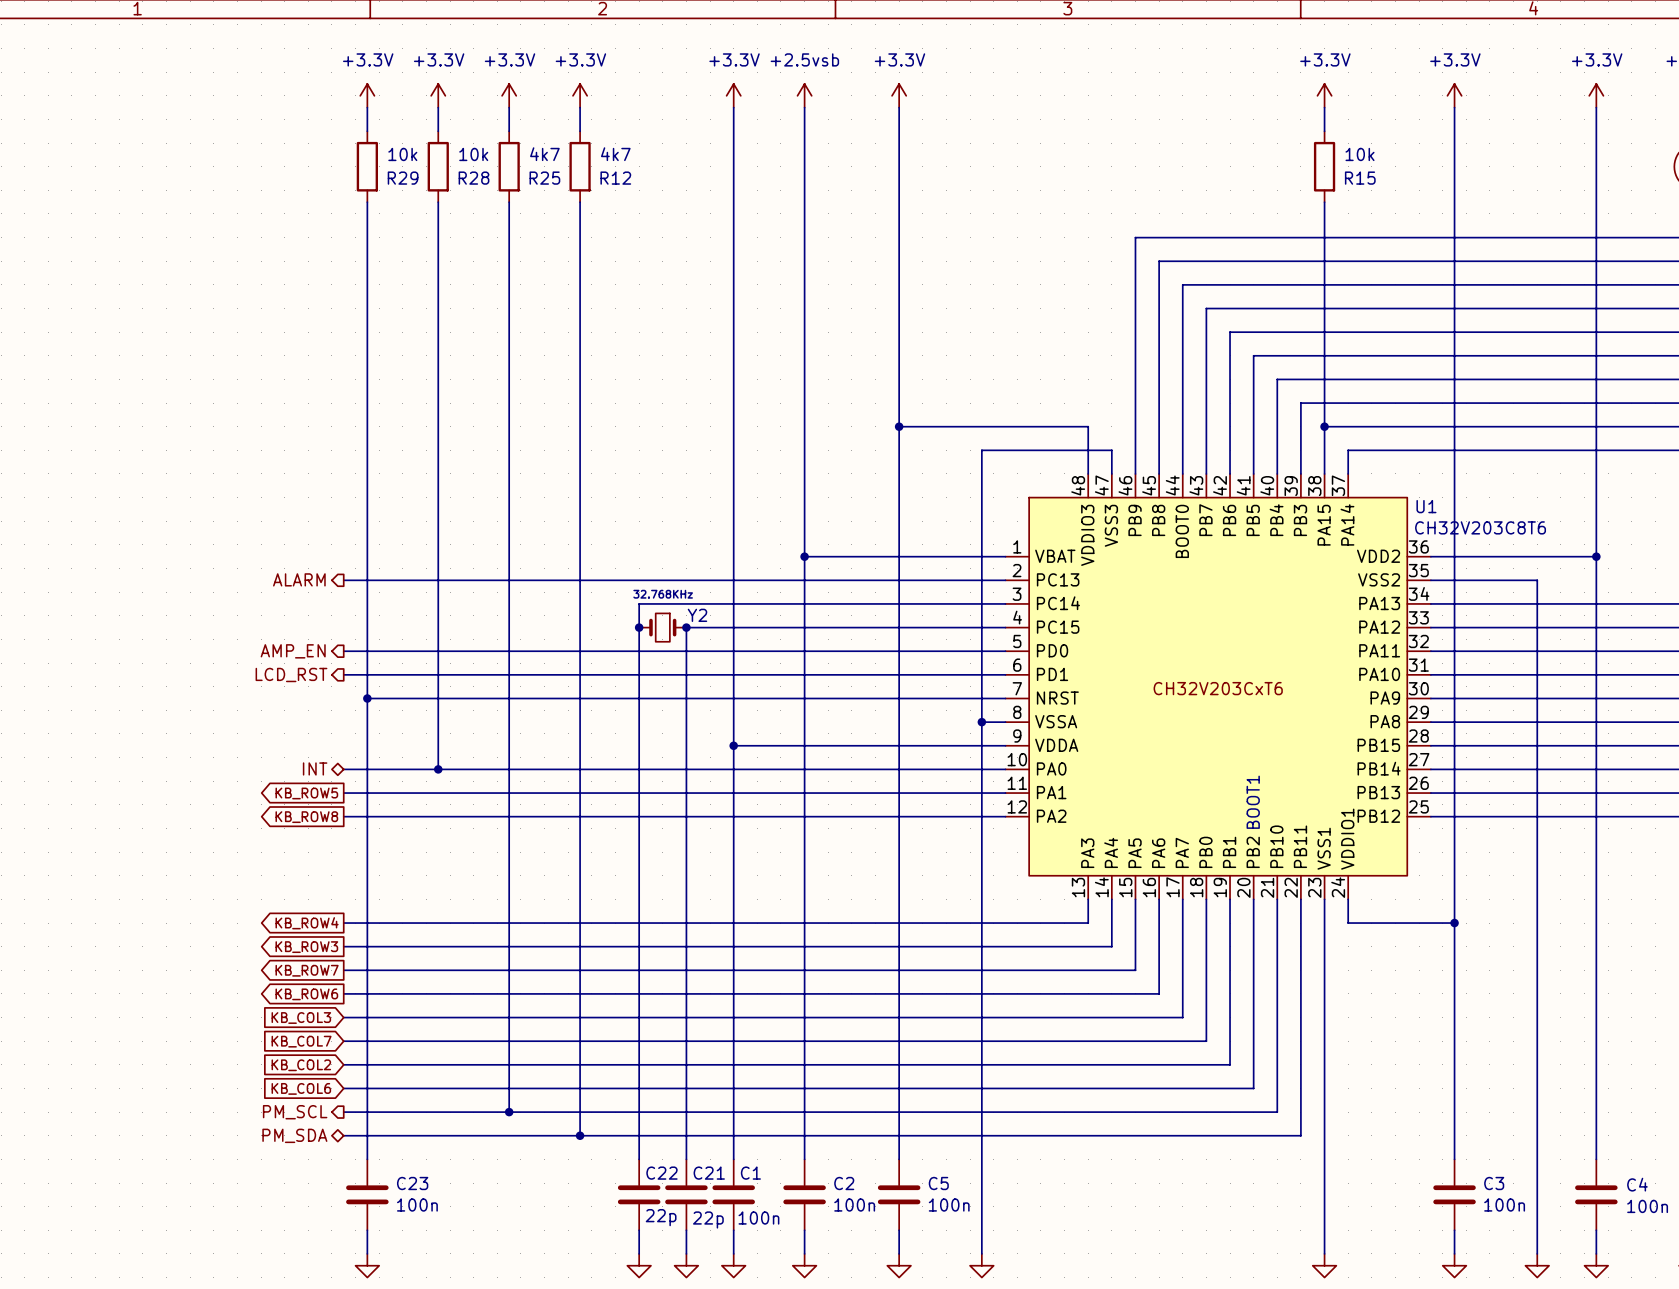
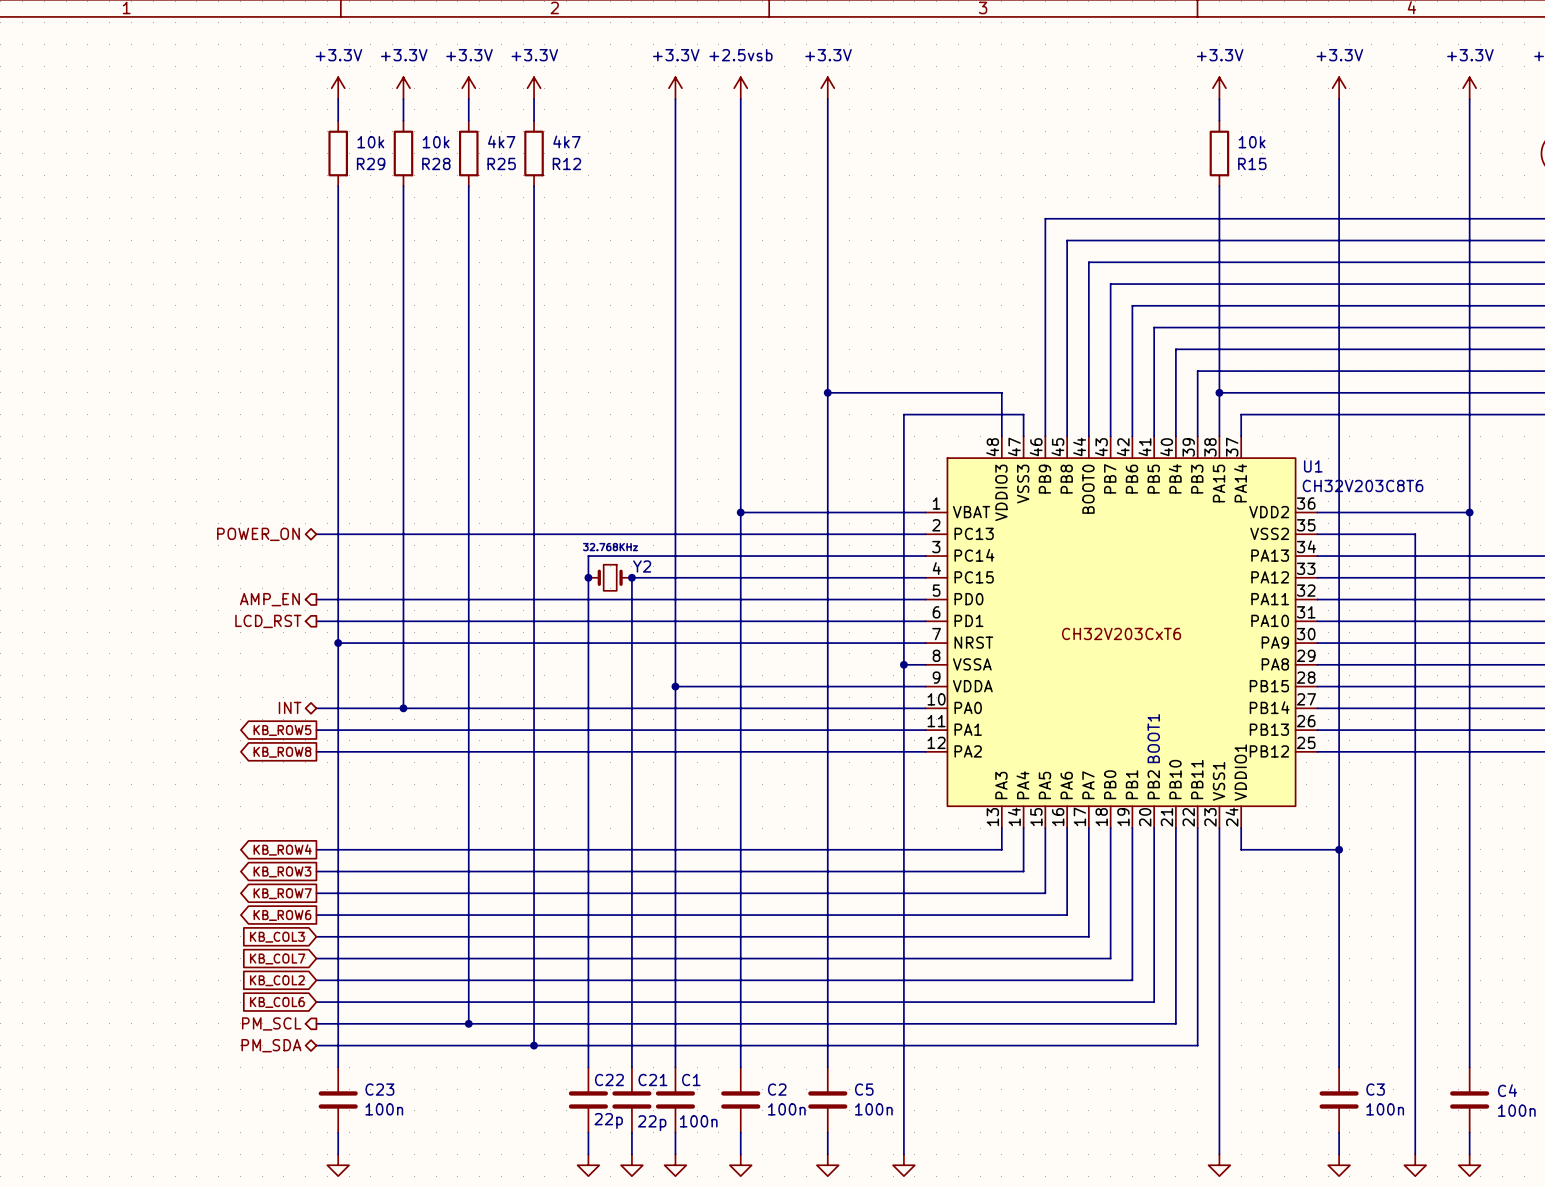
hierarchical label shape: output (299, 579) -> bidirectional (258, 534)
hierarchical label: ALARM (299, 579) -> POWER_ON (258, 534)

